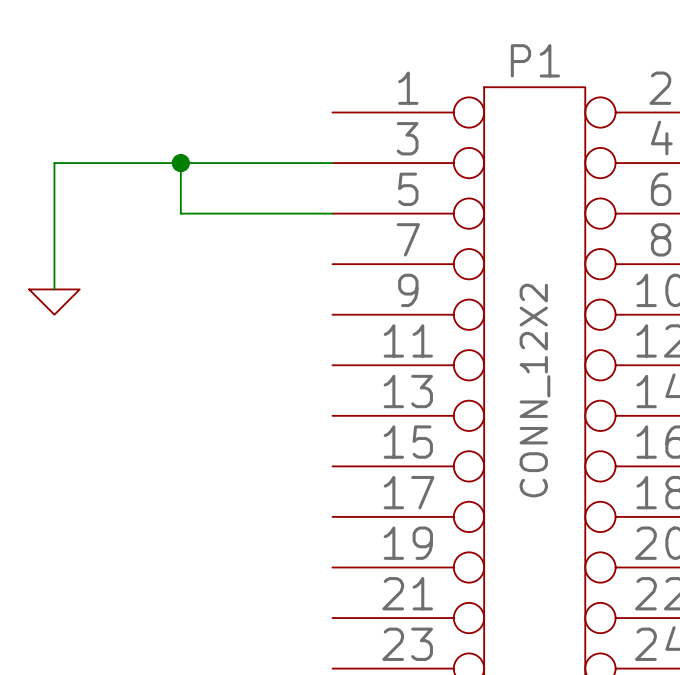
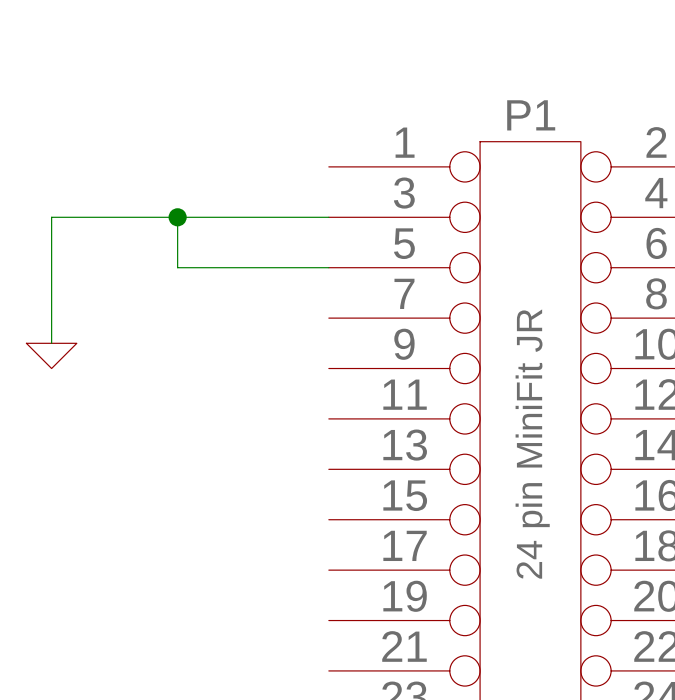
P1 value: CONN_12X2 (534, 390) -> 24 pin MiniFit JR (532, 444)

